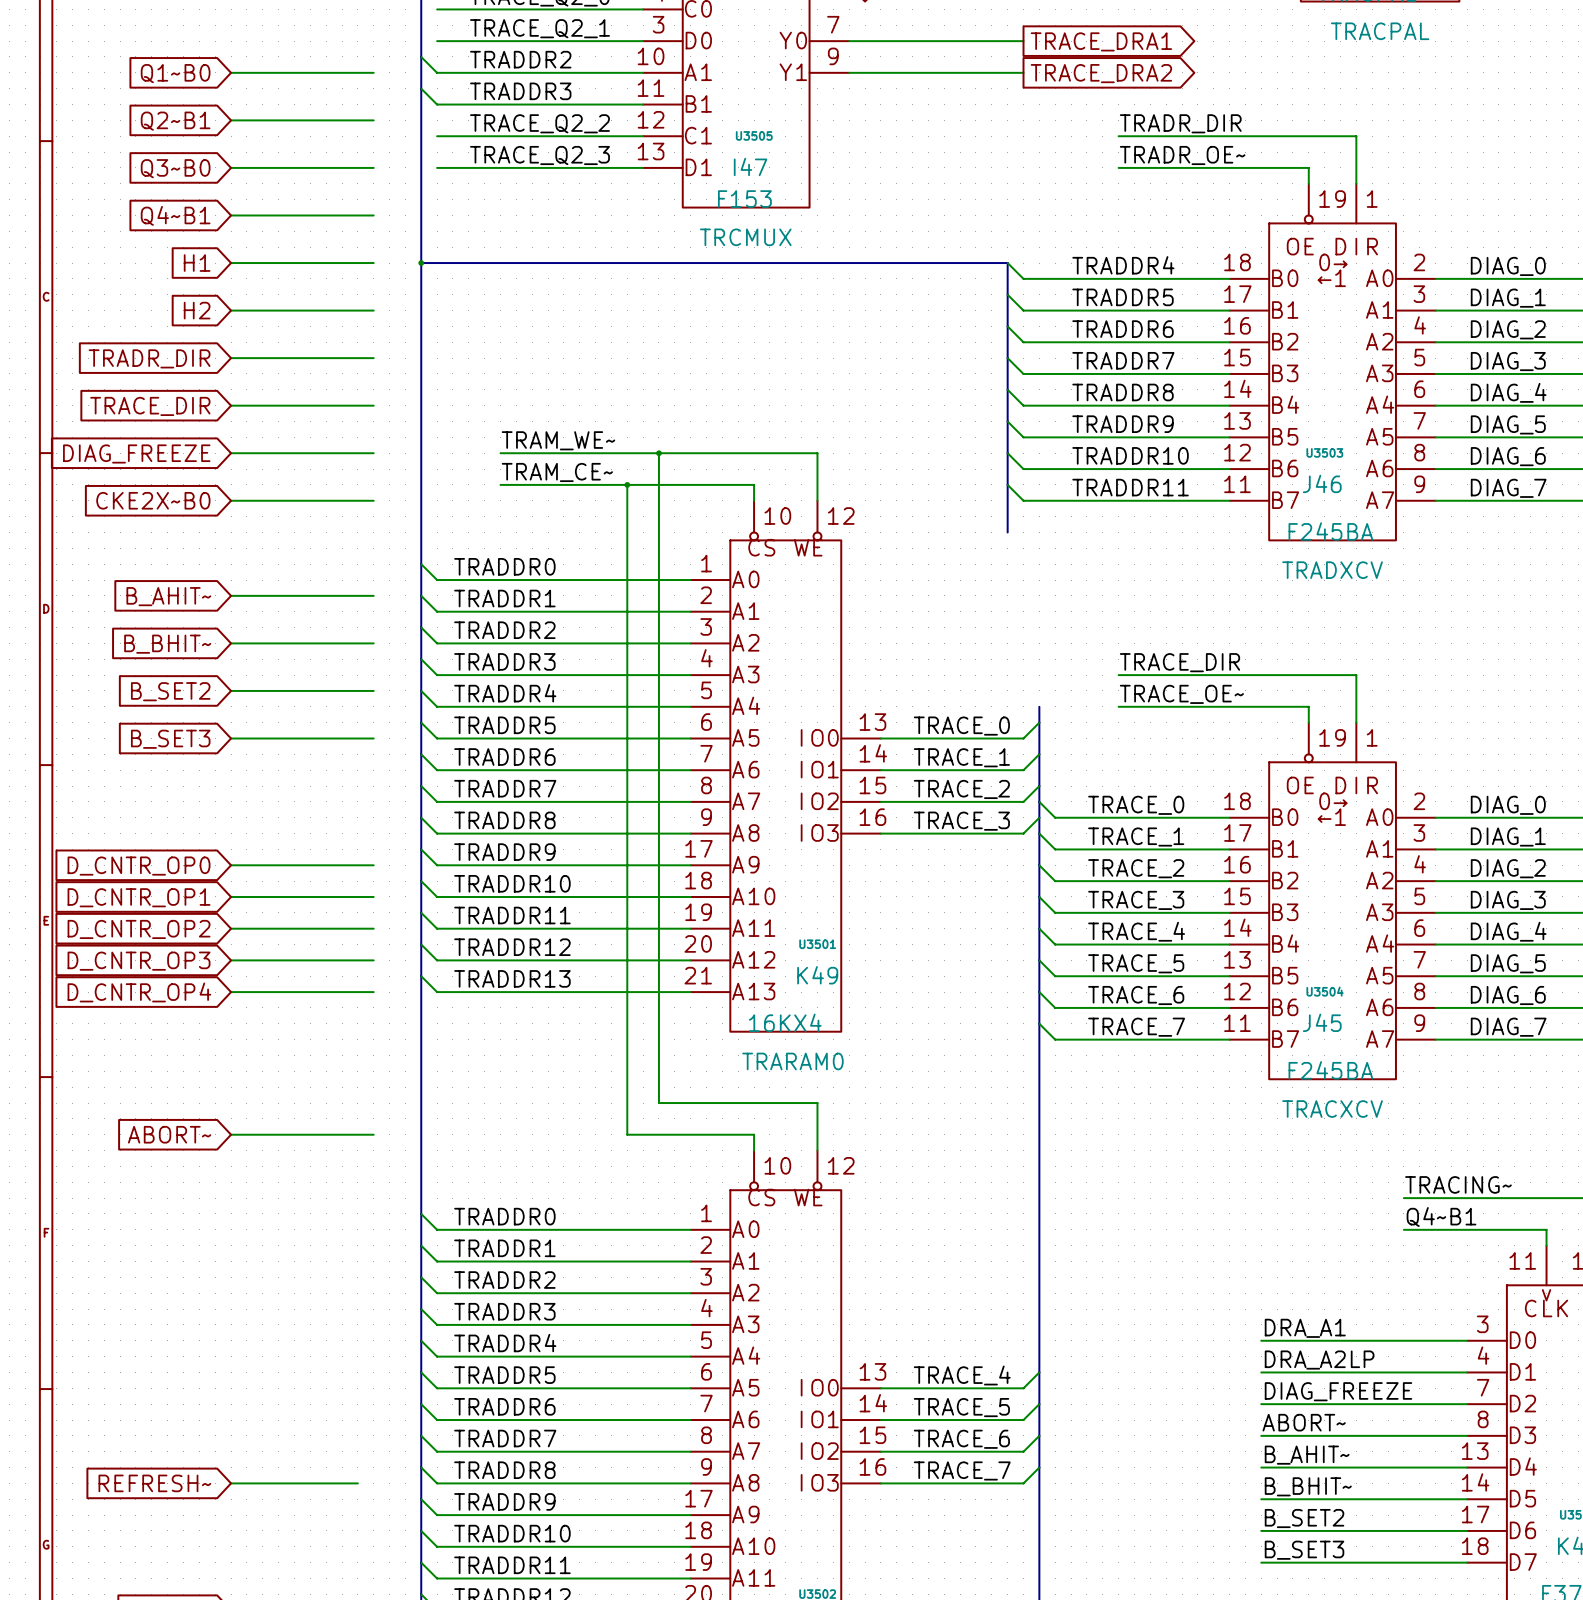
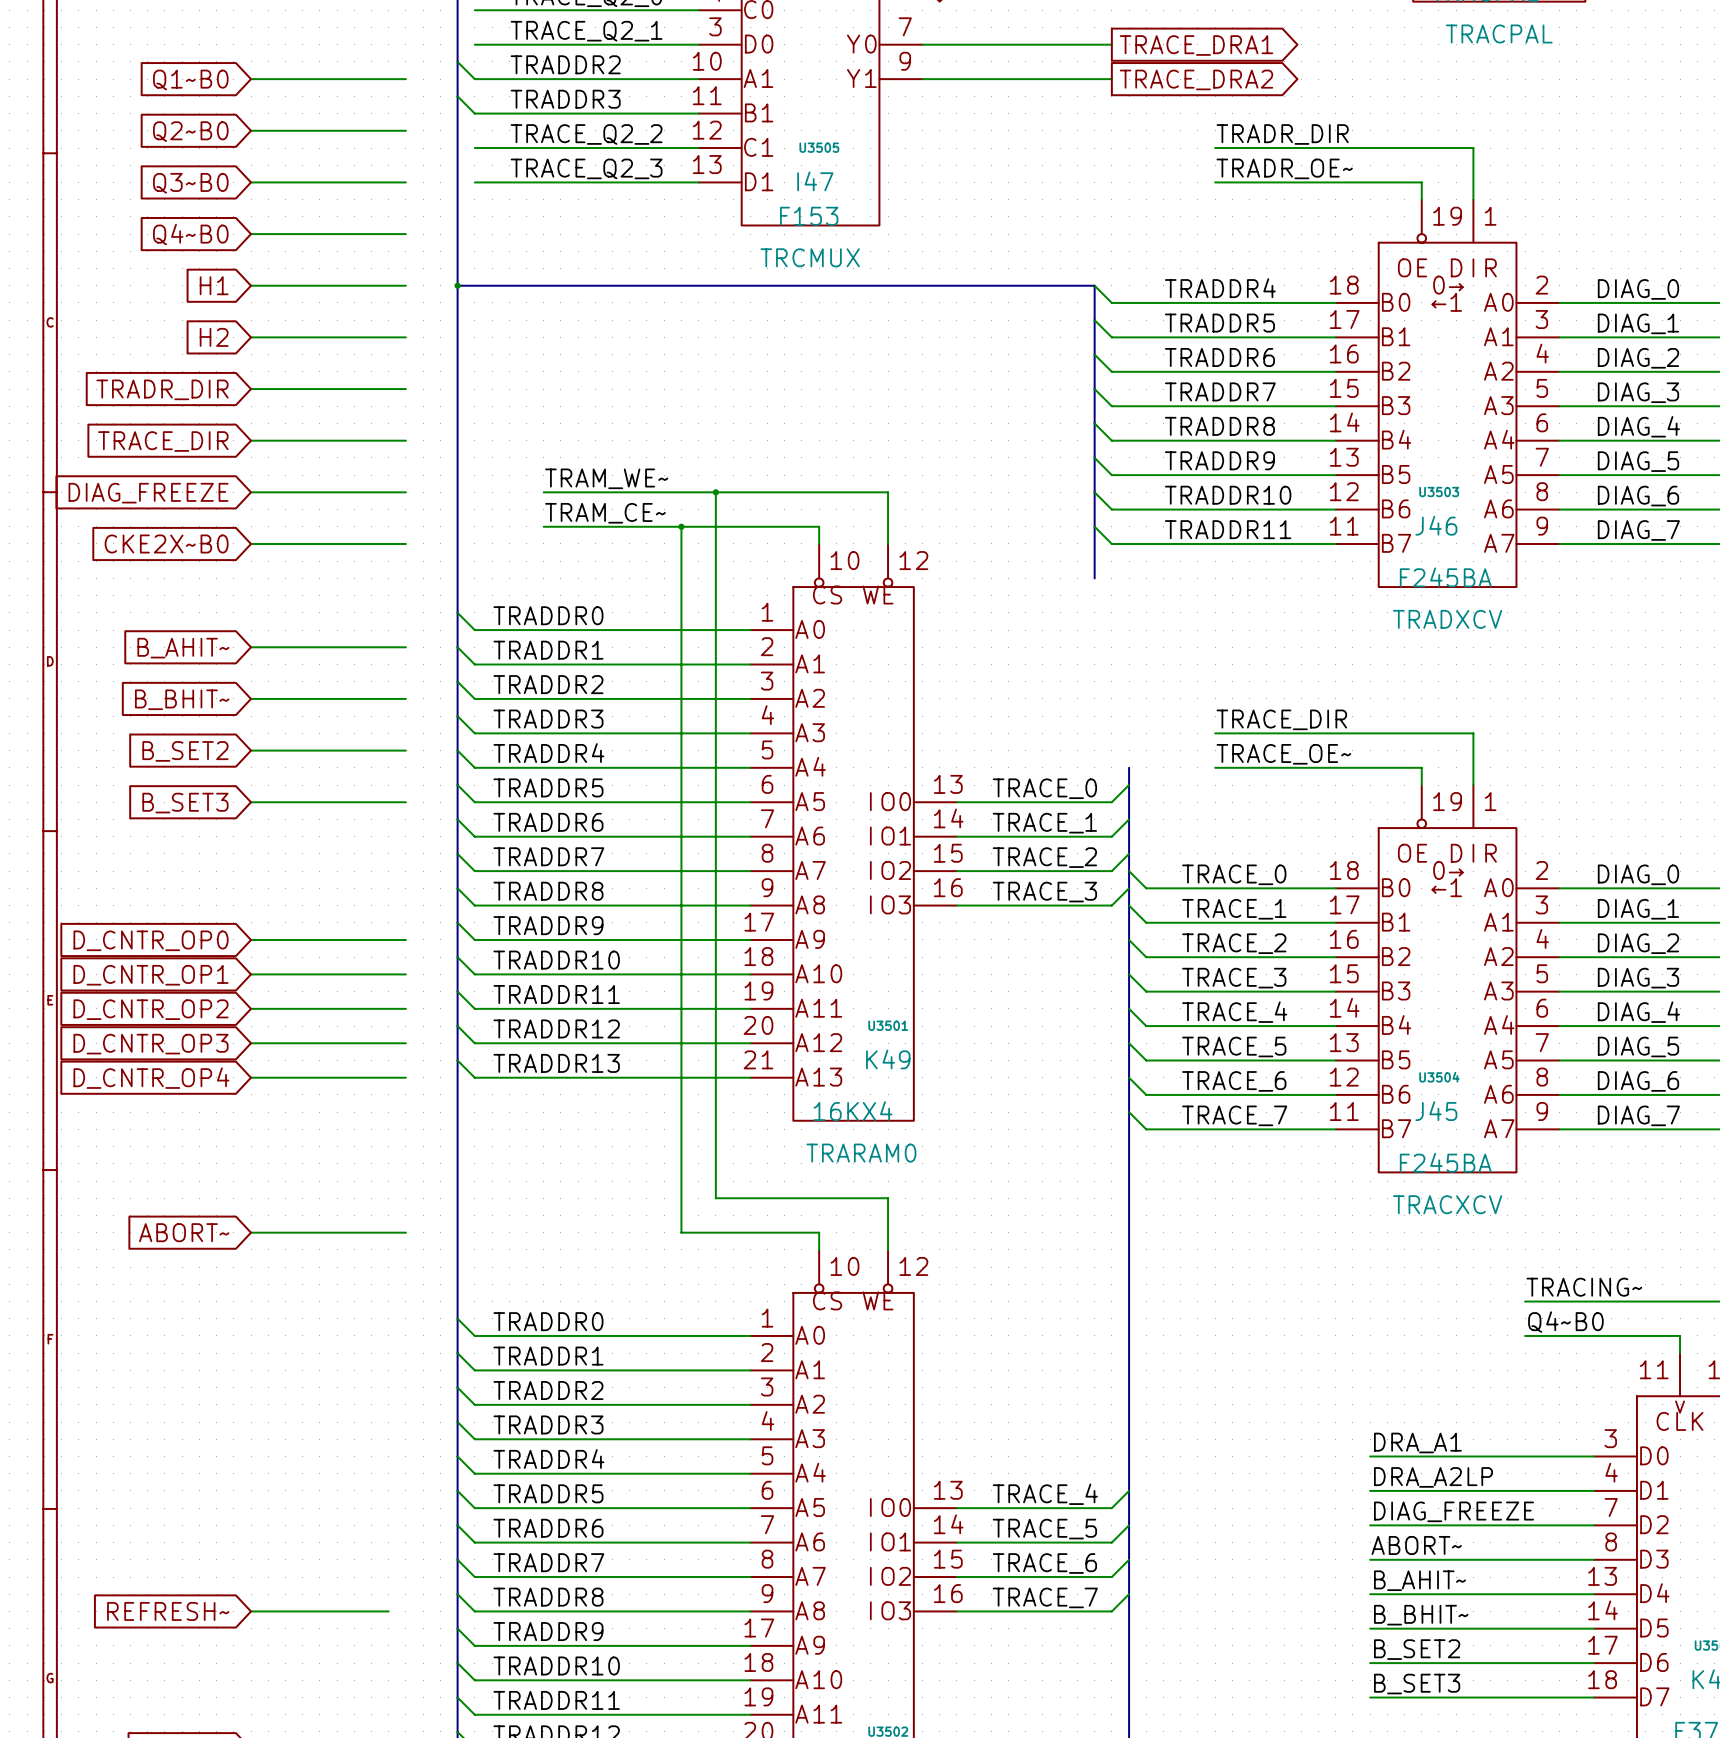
global label: Q2~B1 (175, 121) -> Q2~B0 (190, 131)
global label: Q4~B1 (175, 215) -> Q4~B0 (190, 234)
label: Q4~B1 (1441, 1217) -> Q4~B0 (1565, 1322)

